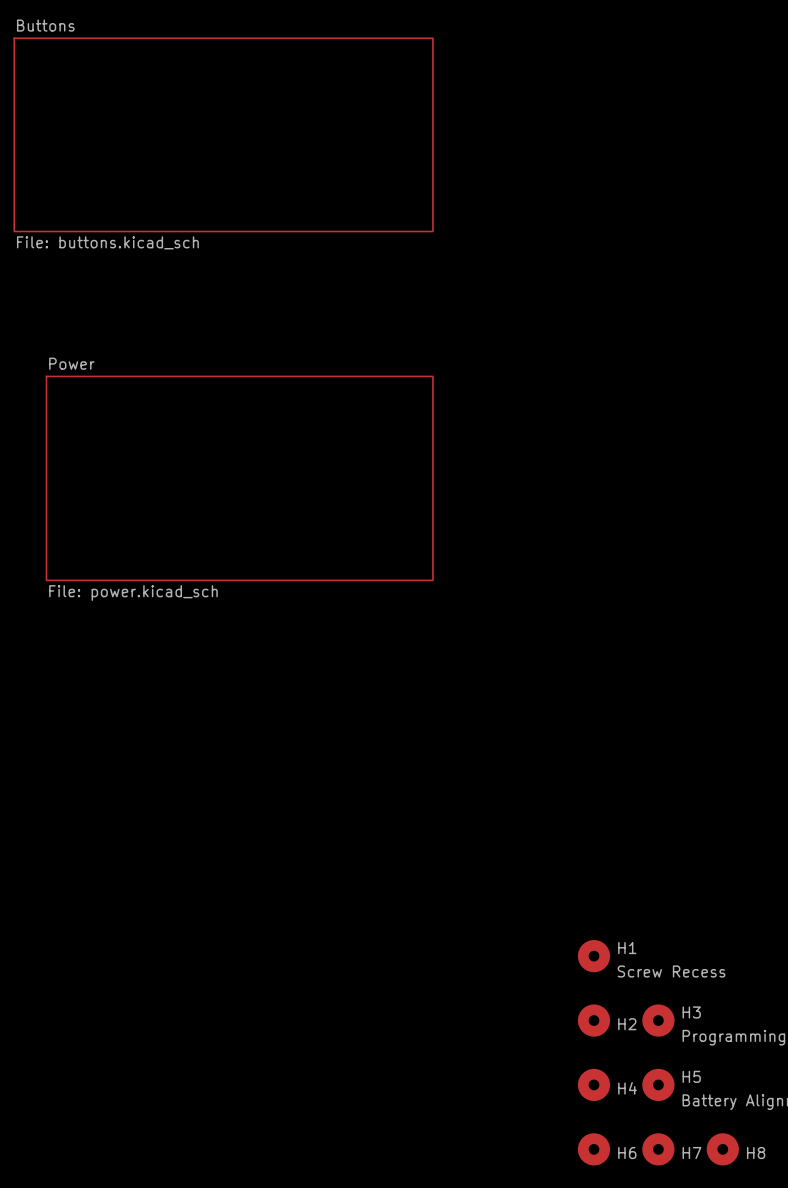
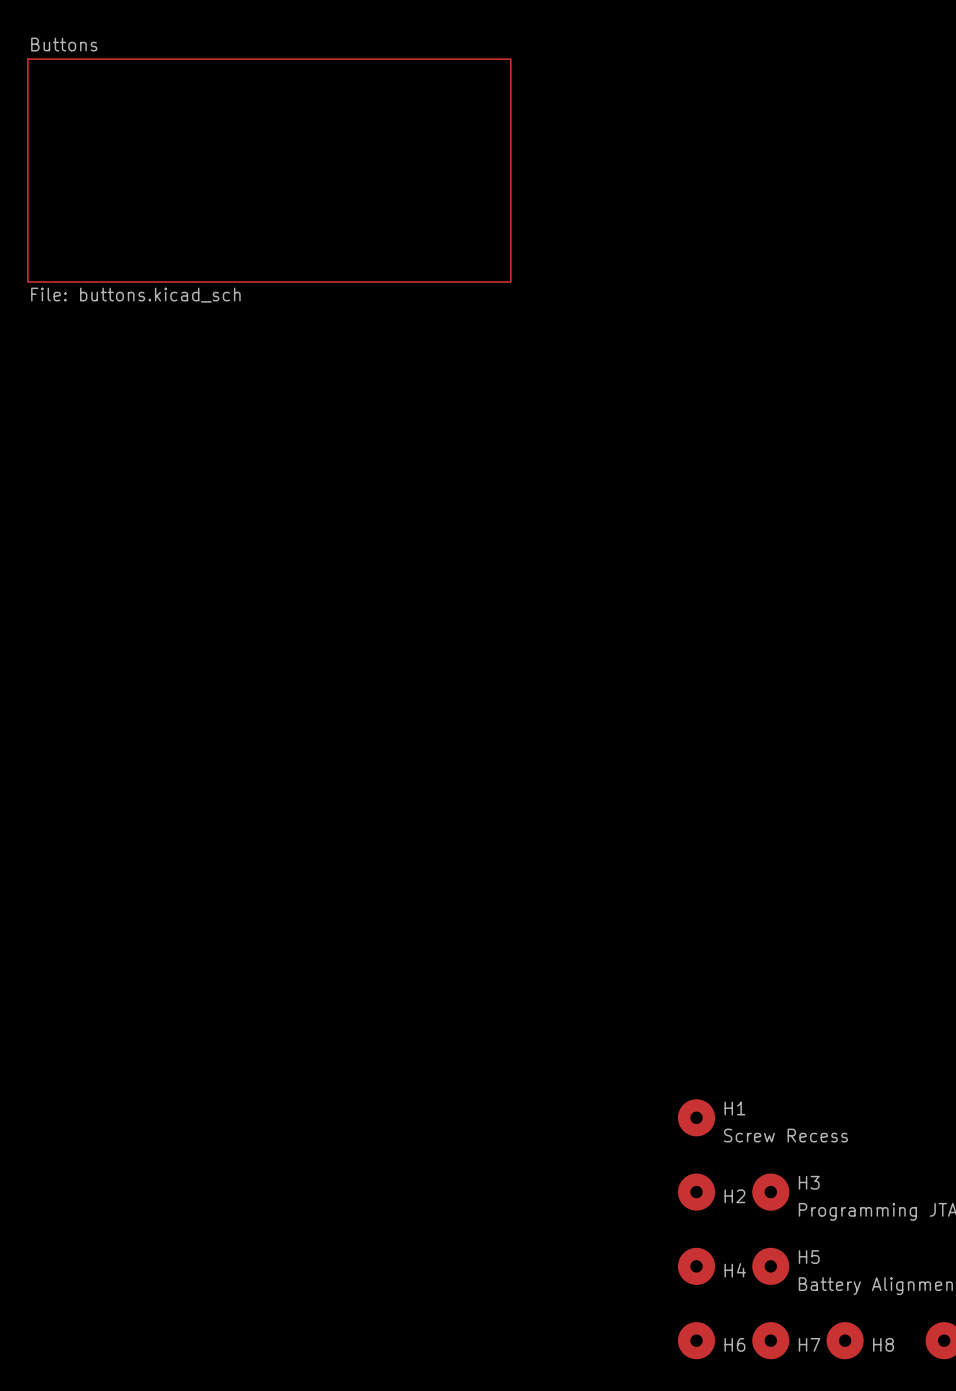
sheet Power: File: power.kicad_sch (239, 478) -> none

